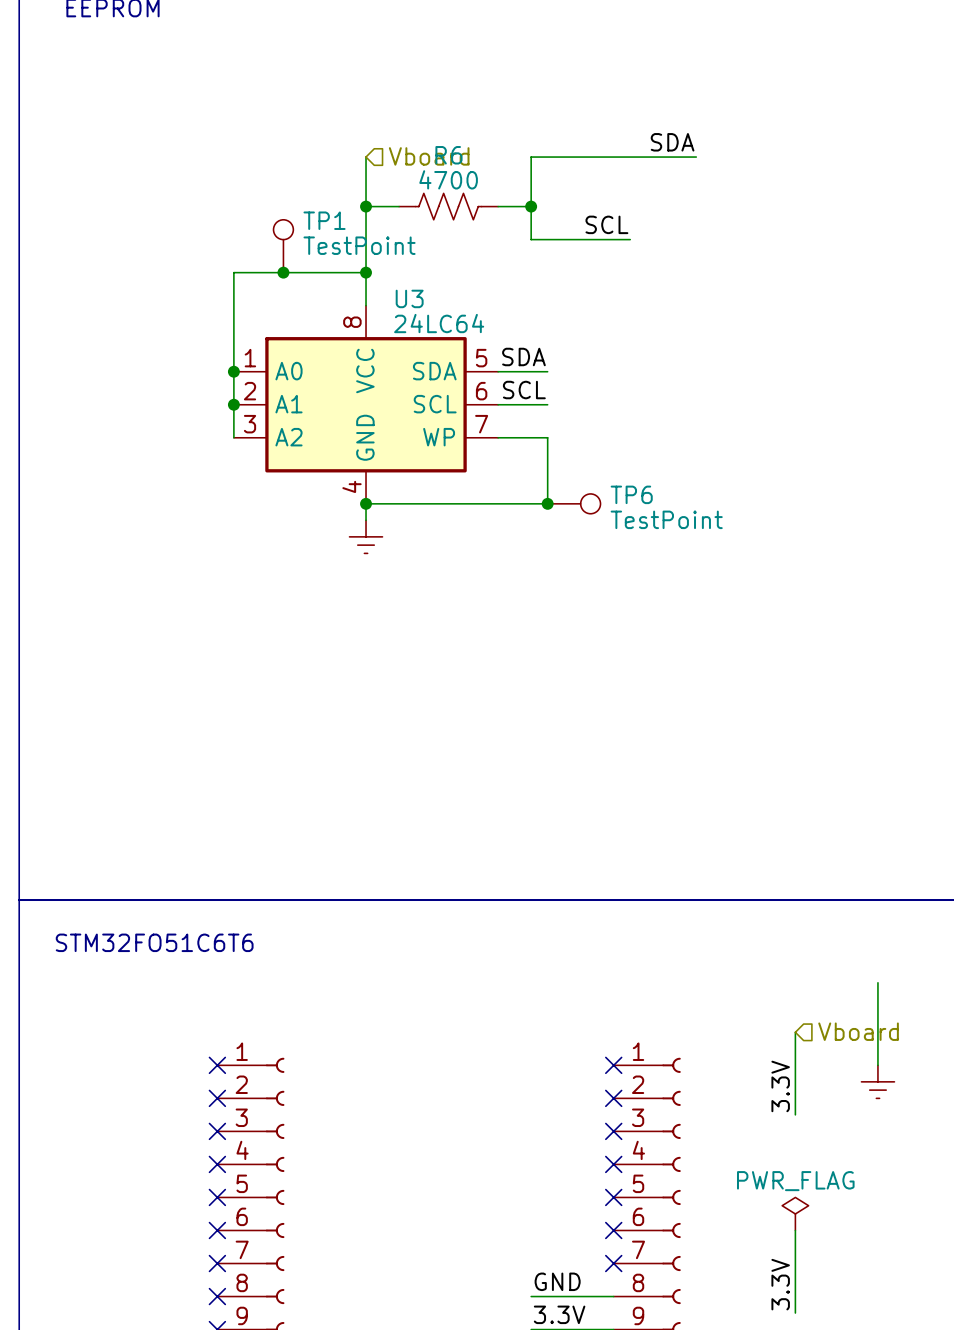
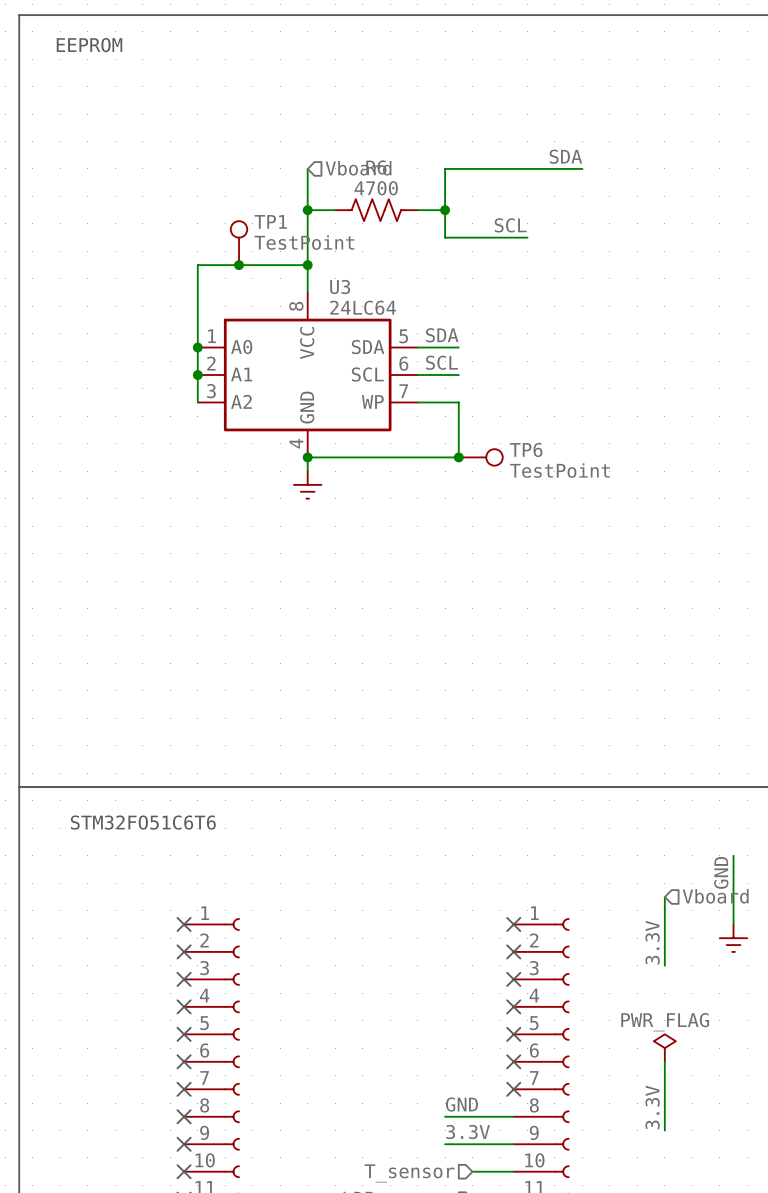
label: none -> GND (721, 872)

